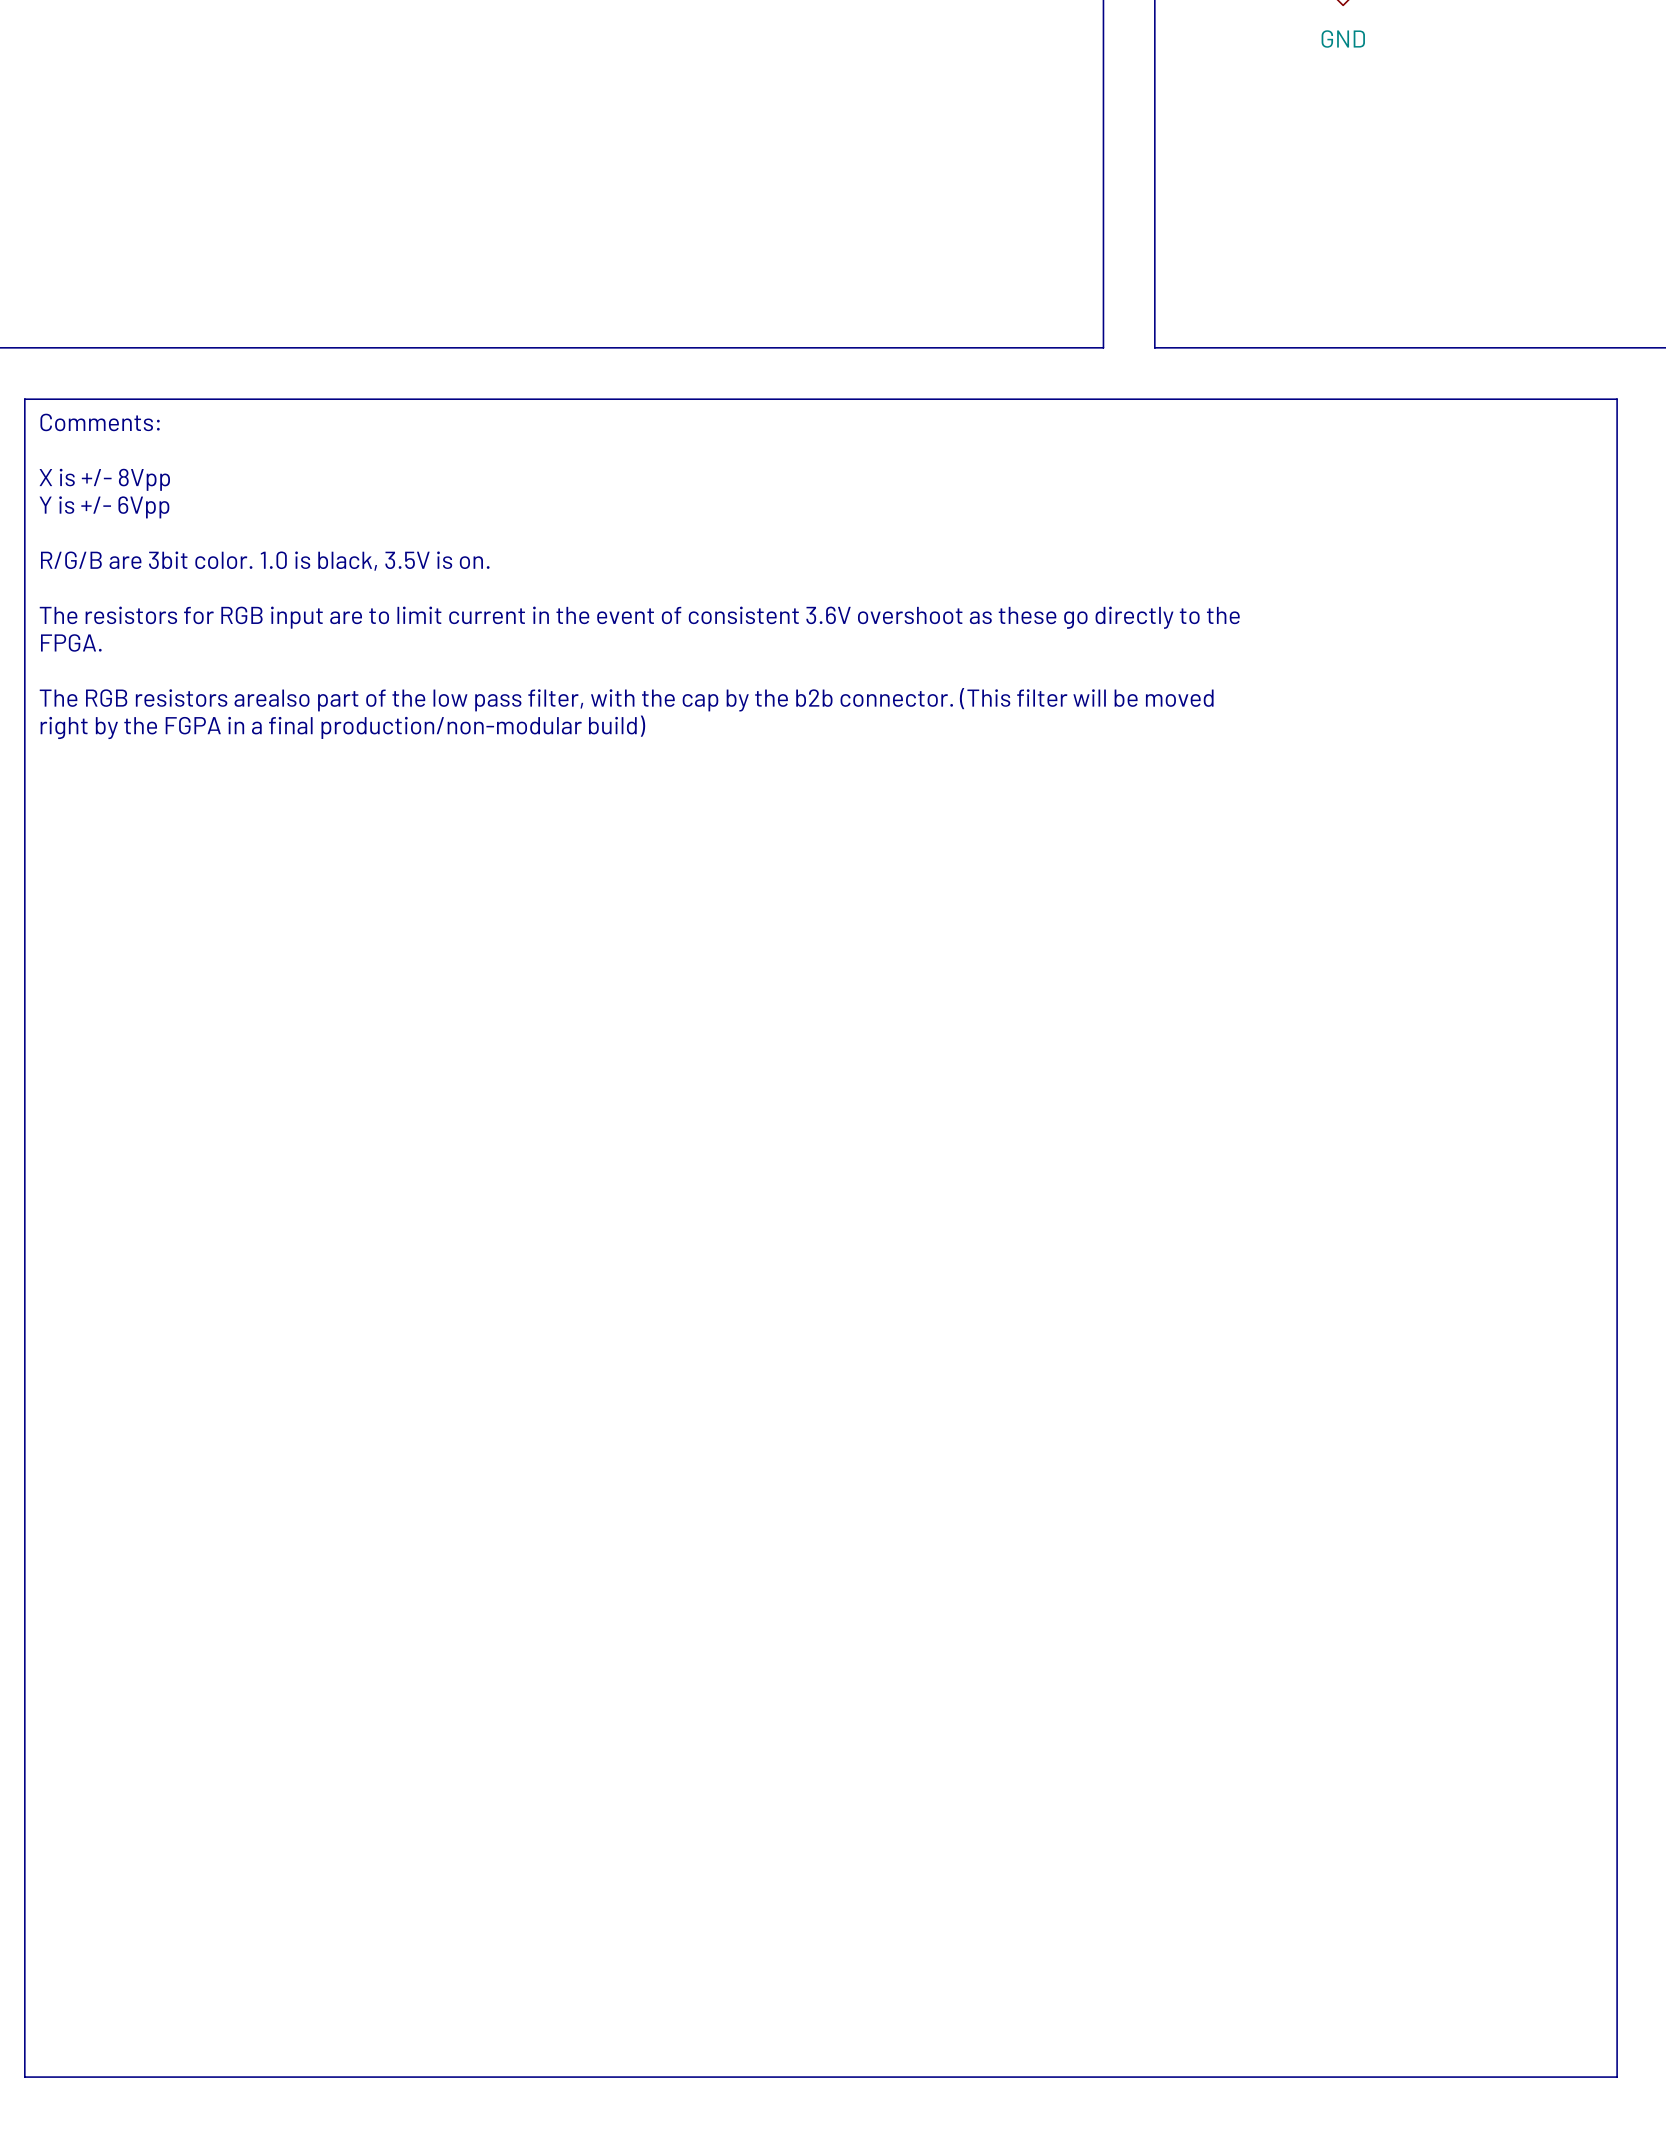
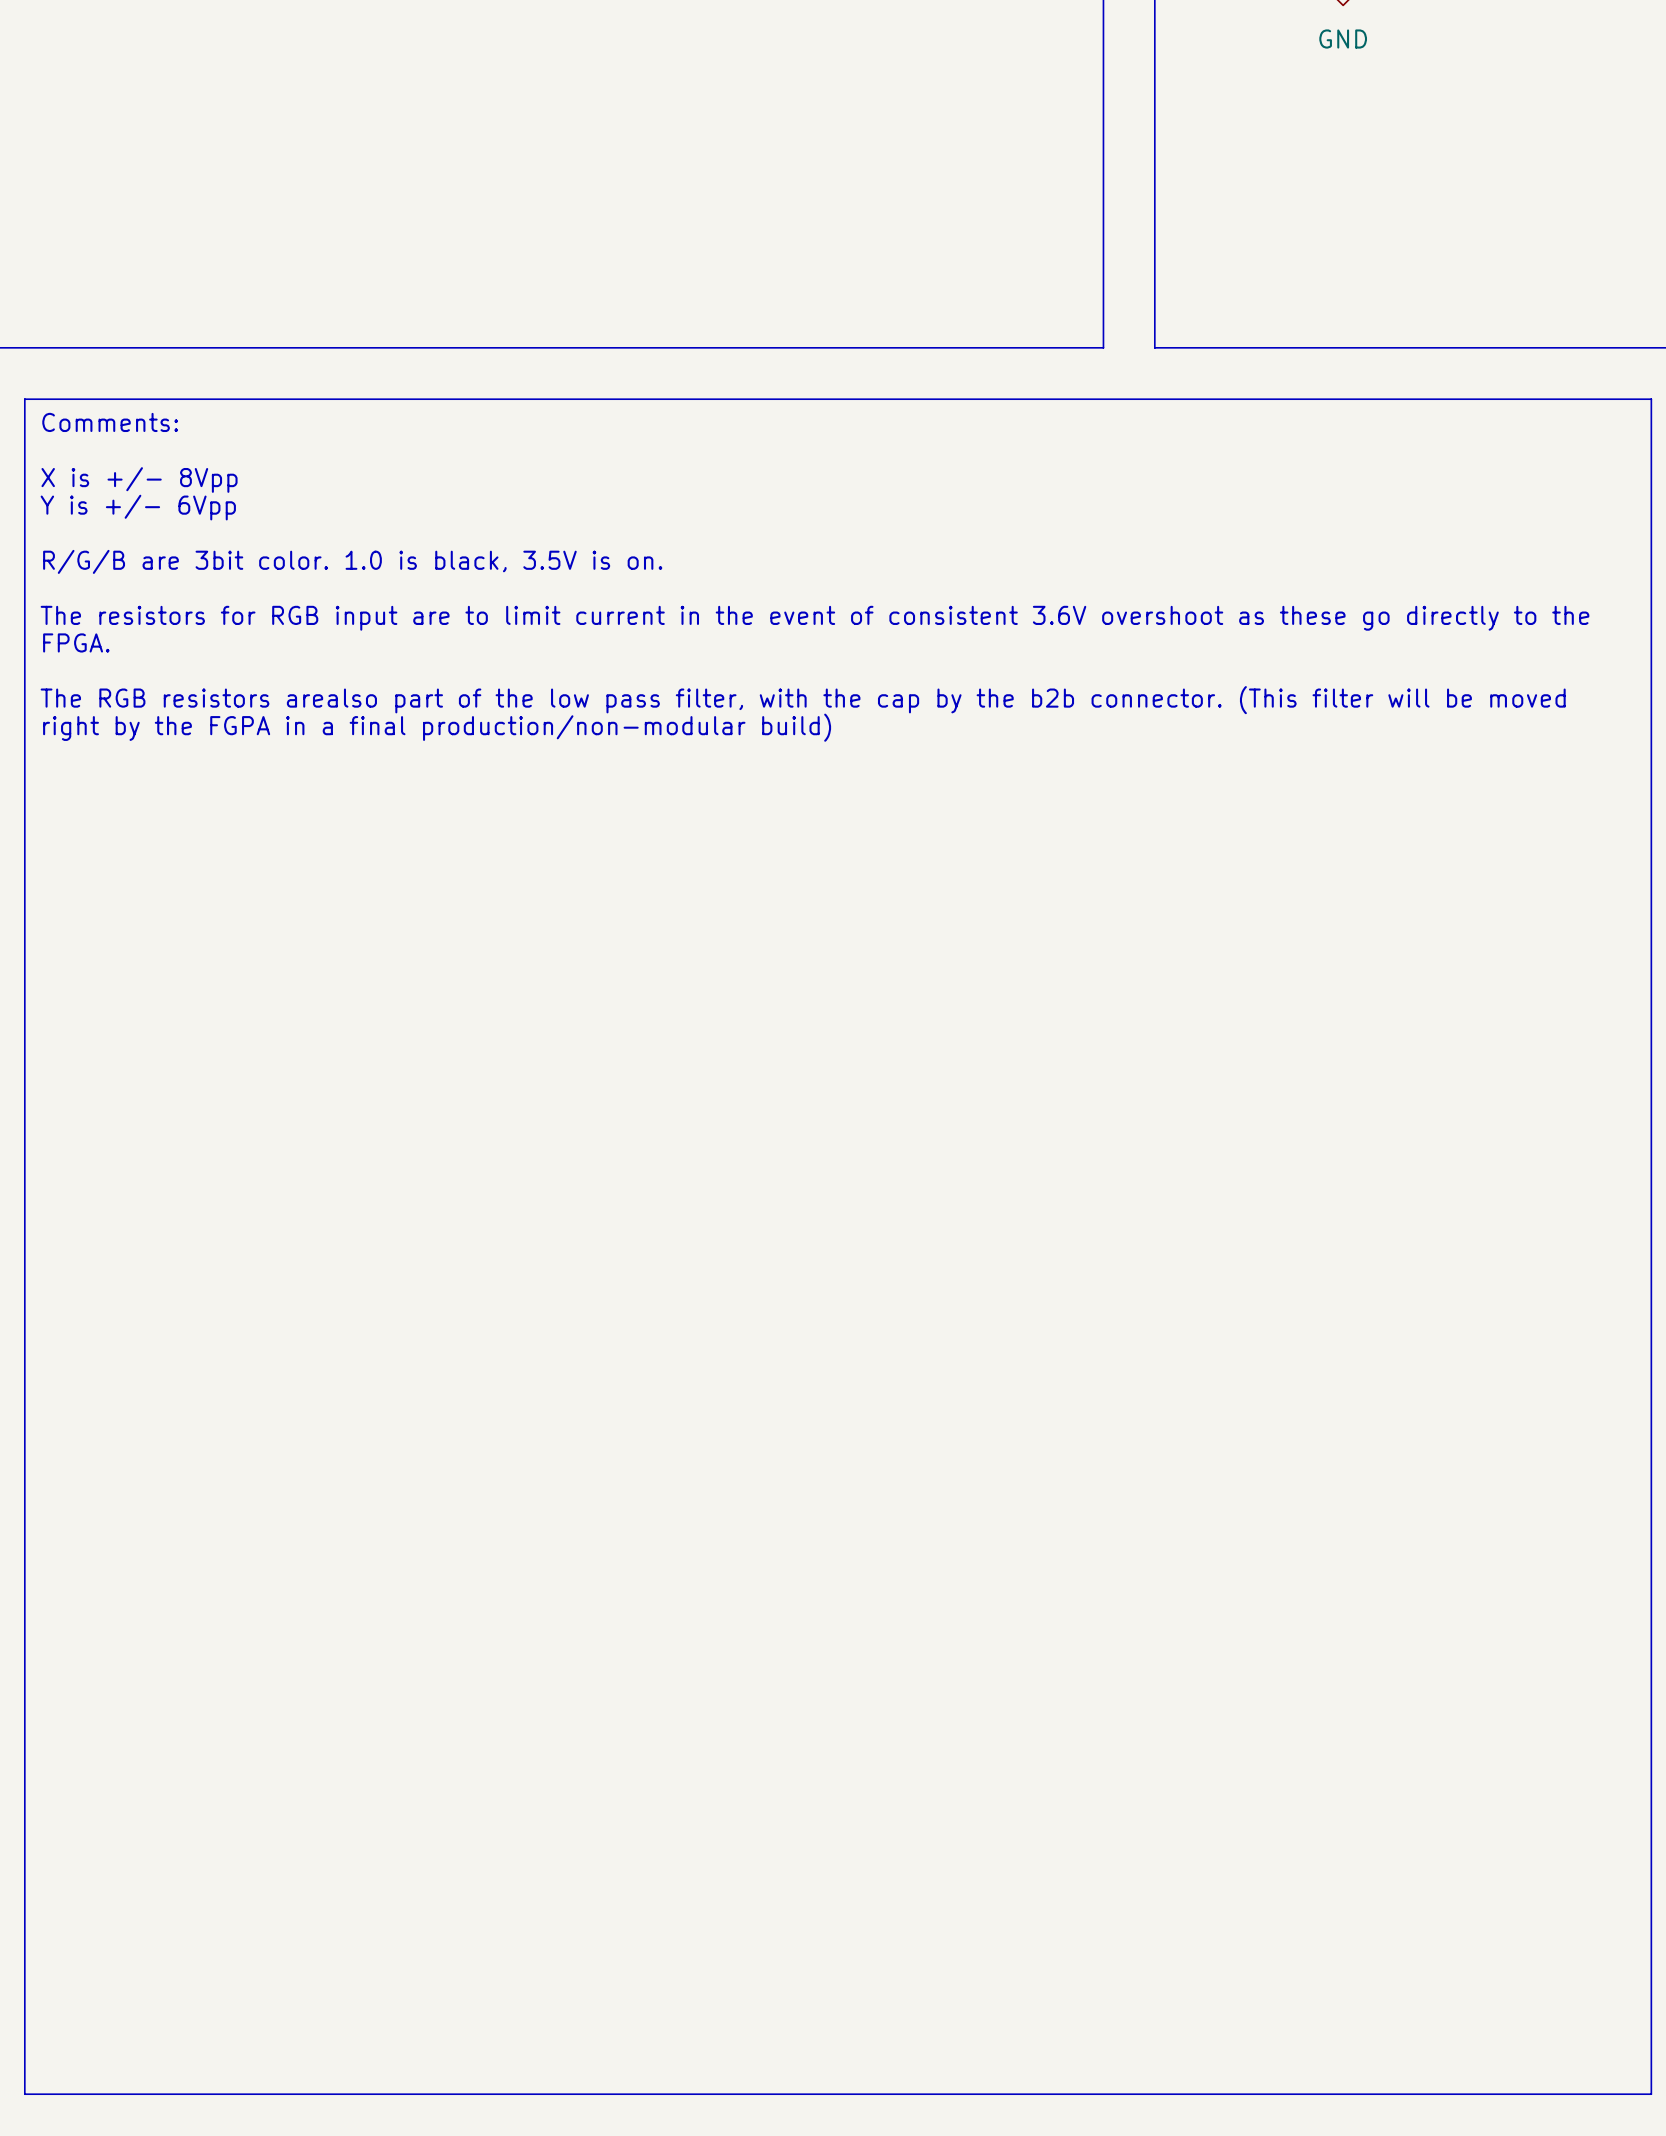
line: (1617, 399) (1617, 2077) (24, 2077) -> (1617, 399) (1651, 399) (1651, 2094) (24, 2094) (24, 2077)

